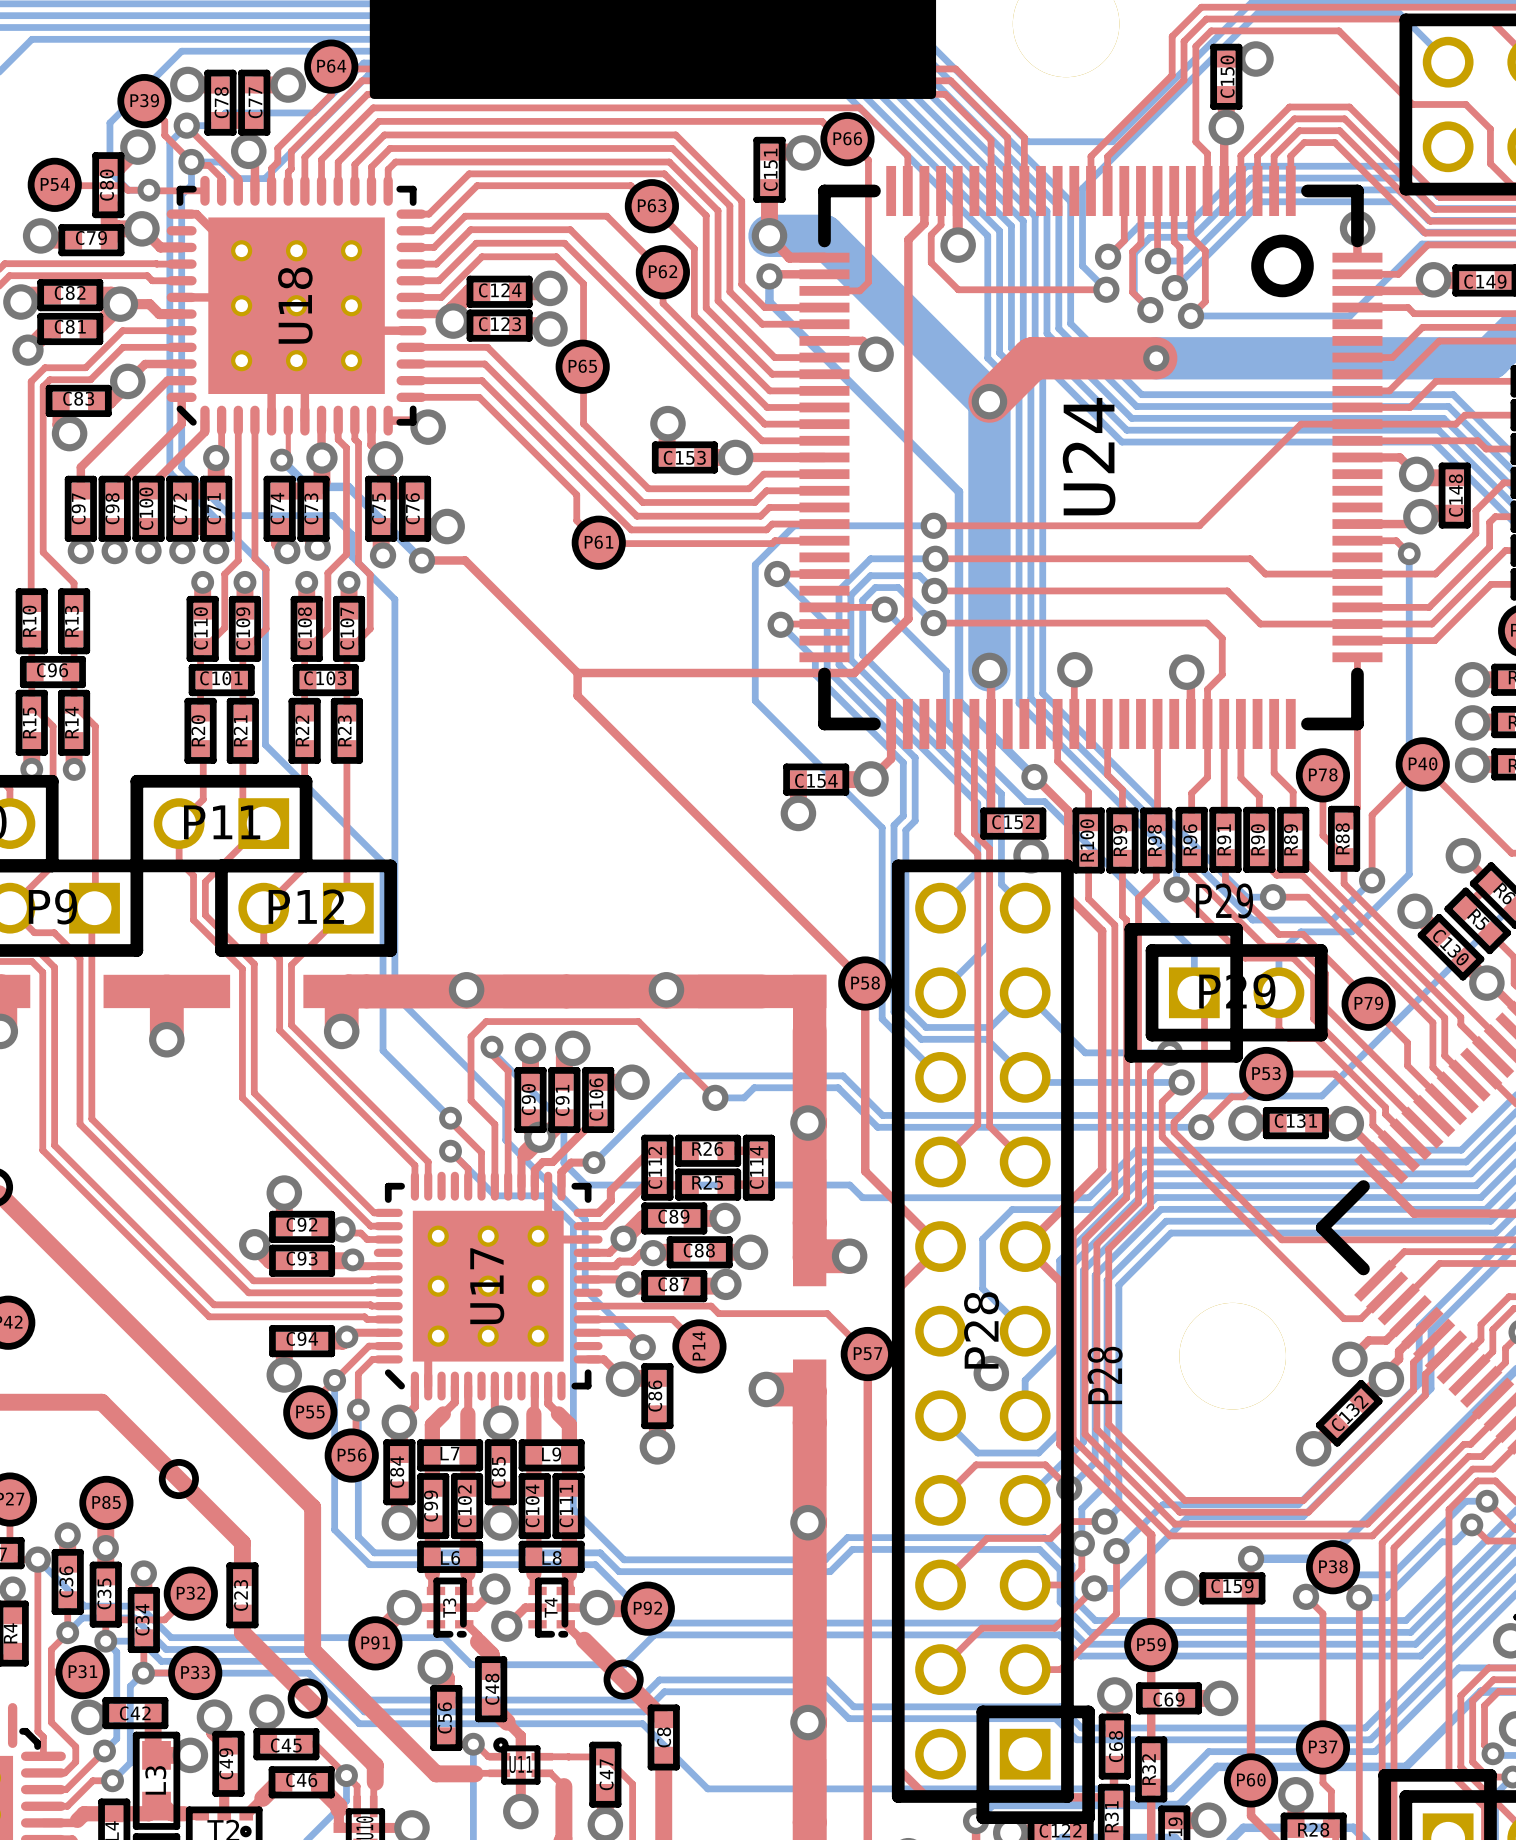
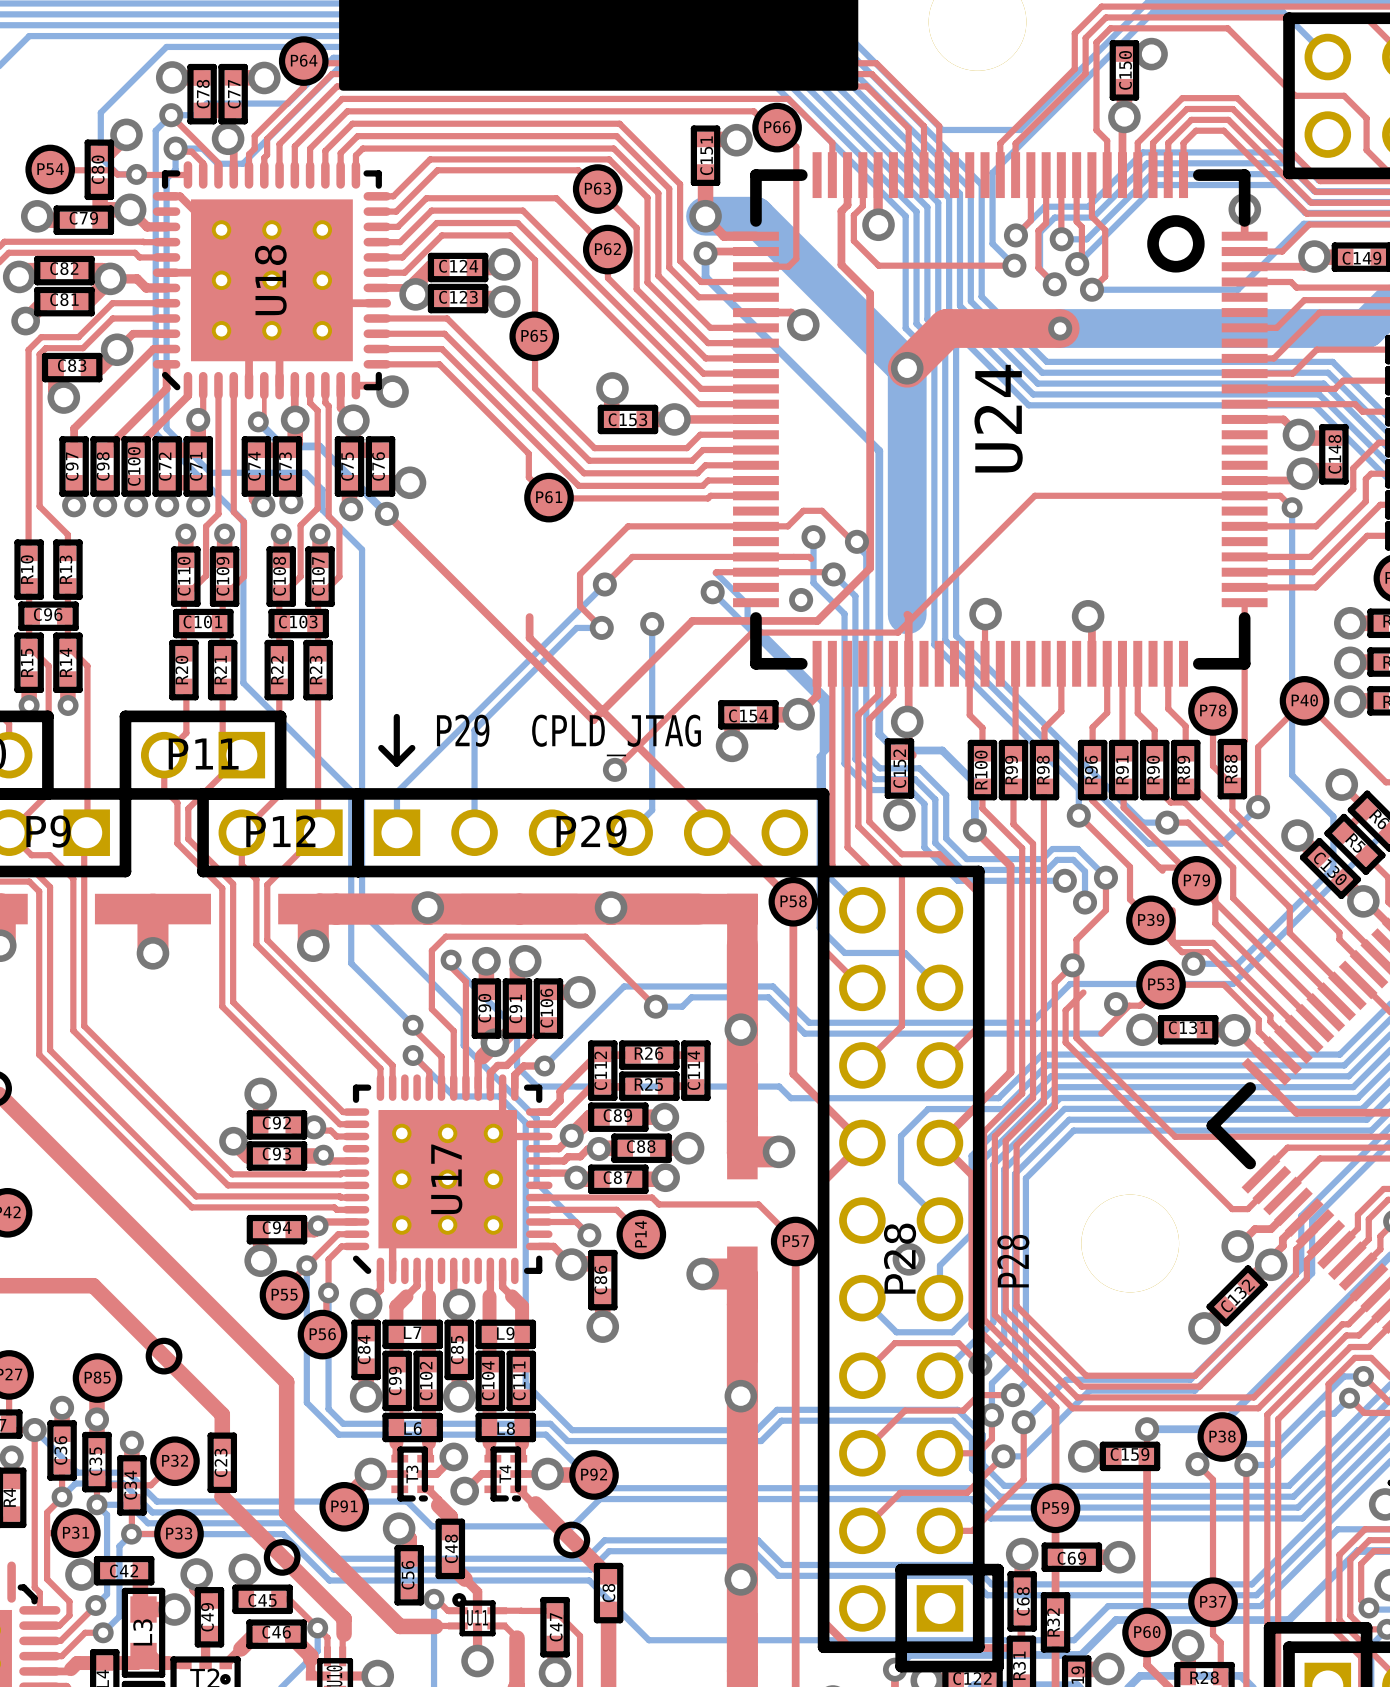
top track: (144, 101) (164, 121) (164, 135) (191, 162) -> none
P39 position: (144, 101) -> (1150, 920)
top track: (917, 230) (908, 239) (908, 618) (854, 673) (577, 673) (465, 560) (421, 560) -> (841, 211) (841, 264) (870, 293) (870, 568) (817, 620) (692, 620) (593, 720) (386, 513)
top track: (1357, 424) (1301, 424) (1199, 525) (933, 525) -> none
bottom track: (933, 525) (794, 525) (755, 564) (755, 700) (882, 827) (882, 1019) (940, 1077) -> none
via: (933, 525) -> none
top track: none -> (1244, 495) (1034, 495) (898, 632) (752, 632) (614, 769)
top track: (935, 558) (1250, 558) (1265, 574) (1357, 574) -> none
bottom track: (935, 558) (870, 558) (839, 590) (839, 664) (977, 803) (977, 870) (940, 908) -> none
via: (935, 558) -> none
top track: none -> (712, 526) (628, 526) (580, 574) (580, 606) (601, 627)
bottom track: (777, 574) (827, 623) (827, 669) (915, 757) (915, 820) (905, 830) (905, 1007) (926, 1027) (990, 1027) (1025, 992) (1085, 1052) (1169, 1052) -> none
via: (777, 574) -> none
top track: none -> (755, 526) (787, 526) (803, 510) (822, 510) (848, 537)
bottom track: none -> (813, 537) (813, 582) (844, 613) (844, 763) (870, 790) (910, 790) (924, 804) (924, 847) (957, 880) (1064, 880)
via: none -> (813, 537)
bottom track: none -> (848, 537) (866, 555) (866, 754) (879, 768) (919, 768) (946, 795) (946, 838) (966, 859) (1042, 859) (1052, 849) (1077, 849) (1105, 877)
top track: (934, 590) (1227, 590) (1260, 624) (1357, 624) -> none
bottom track: (934, 590) (919, 575) (870, 575) (850, 595) (850, 659) (989, 798) (989, 943) (940, 992) -> (712, 592) (822, 702) (822, 870) (862, 910)
top track: none -> (755, 556) (632, 556) (604, 584)
bottom track: (884, 609) (946, 671) (946, 721) (1026, 801) (1044, 801) (1194, 951) (1194, 992) -> none
via: (884, 609) -> none
top track: (933, 623) (1207, 623) (1222, 638) (1222, 674) (1207, 689) (1207, 723) -> none
bottom track: (933, 623) (898, 587) (875, 587) (862, 600) (862, 655) (1001, 793) (1001, 884) (1025, 908) -> none
via: (933, 623) -> none
via position: (780, 624) -> (712, 592)
top track: none -> (755, 572) (831, 572) (833, 574)
bottom track: none -> (833, 574) (855, 596) (855, 759) (875, 779) (914, 779) (935, 799) (935, 842) (962, 869) (1047, 869) (1057, 859) (1073, 859) (1085, 871) (1085, 902)
via: none -> (833, 574)
bottom track: none -> (604, 584) (396, 792) (396, 832)
via: none -> (604, 584)
via: none -> (801, 600)
via: (989, 670) -> none
bottom track: none -> (652, 624) (652, 810) (629, 832)
via: none -> (652, 624)
bottom track: none -> (601, 627) (576, 627) (474, 730) (474, 832)
via: none -> (601, 627)
bottom track: (958, 701) (1034, 777) -> (879, 643) (879, 734) (895, 750) (942, 750) (974, 783) (974, 830)
top track: none -> (832, 663) (832, 865) (822, 874) (822, 948) (862, 987)
top track: none -> (847, 663) (847, 847) (867, 866)
top track: (957, 758) (957, 833) (977, 853) (977, 1124) -> (878, 695) (858, 714) (858, 826) (901, 869) (901, 1025) (896, 1031)
top track: (974, 758) (974, 833) (989, 848) (989, 1126) (1025, 1161) -> (893, 695) (869, 719) (869, 821) (901, 854) (939, 854) (977, 892) (977, 1028) (939, 1065)
top track: (1057, 761) (1088, 792) (1088, 822) -> (969, 698) (969, 715) (982, 727) (982, 753)
top track: (1107, 774) (1122, 789) (1122, 822) -> (1015, 710) (1015, 751) (1013, 753)
top track: (1157, 775) (1156, 822) -> (1061, 711) (1044, 728) (1044, 753)
top track: (1034, 777) (1068, 810) (1068, 897) (1102, 931) (1102, 944) -> (974, 830) (1010, 866)
via: (1034, 777) -> none
line: none -> (396, 716) (396, 763)
via: none -> (907, 721)
text: none -> P29 CPLD_JTAG (568, 735)
line: none -> (381, 748) (396, 763)
line: none -> (412, 748) (396, 763)
C152 rotation: 0° (1013, 823) -> 90° clockwise (899, 768)
via: none -> (614, 769)
R100 position: (1088, 840) -> (982, 770)
R99 position: (1122, 840) -> (1013, 770)
R98 position: (1156, 840) -> (1044, 770)
bottom track: (1409, 845) (1409, 874) (1351, 931) (1300, 931) (1278, 953) (1278, 992) -> (1292, 775) (1333, 816) (1333, 868) (1237, 963) (1193, 963)
via: (1031, 855) -> none
top track: (1088, 858) (1088, 898) -> (982, 786) (982, 808) (998, 824)
top track: (1122, 858) (1122, 915) -> (1013, 786) (1013, 824) (1029, 839)
top track: (1156, 858) (1156, 880) (1138, 898) -> (1044, 786) (1043, 823)
P28 footprint: [891, 859, 1095, 1824] -> [817, 865, 1004, 1673]
top track: (1292, 875) (1302, 875) (1444, 1017) (1444, 1055) -> (1184, 802) (1289, 907) (1289, 933) (1324, 968)
via: none -> (899, 815)
top track: (1295, 897) (1307, 897) (1432, 1022) (1432, 1067) -> (1188, 822) (1233, 867) (1233, 898) (1313, 978)
text: P29 (1224, 901) -> none
via: none -> (974, 830)
P29 footprint: [1124, 923, 1328, 1063] -> [352, 788, 830, 878]
top track: (1278, 934) (1303, 934) (1368, 999) (1368, 1003) (1407, 1042) (1407, 1065) -> (1172, 856) (1290, 977)
top track: (1232, 945) (1245, 958) (1293, 958) (1313, 978) (1313, 1018) (1323, 1028) -> (1130, 866) (1130, 899) (1173, 942) (1213, 942)
via: none -> (1105, 877)
via: none -> (1064, 880)
via: none -> (1085, 902)
top track: (1194, 992) (1204, 1002) (1204, 1091) (1174, 1122) -> (1105, 877) (1105, 910) (1076, 939) (1076, 1028)
P79 position: (1368, 1003) -> (1196, 880)
via: none -> (1193, 963)
bottom track: (1344, 1073) (1321, 1096) (1200, 1096) (1180, 1115) (1124, 1115) -> (1233, 983) (1070, 983) (1031, 1022)
bottom track: (1025, 1077) (1030, 1082) (1181, 1082) -> none
via: (1181, 1082) -> none
via: none -> (1116, 1004)
via: (1201, 1127) -> none

